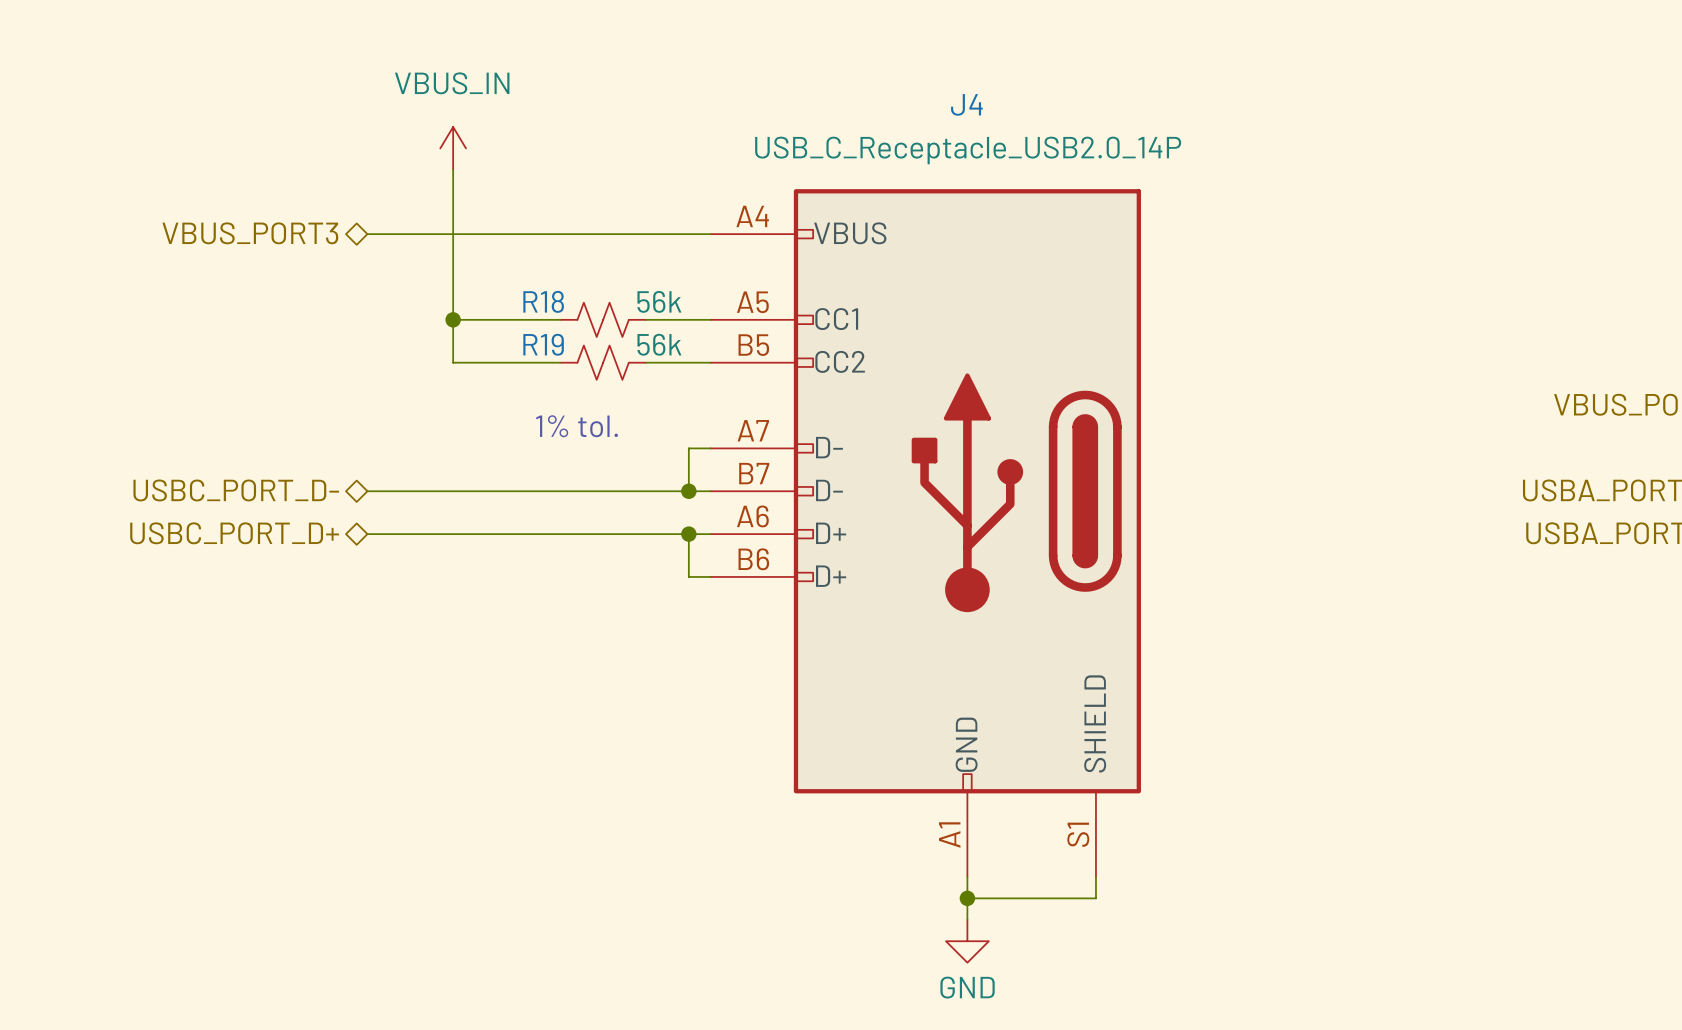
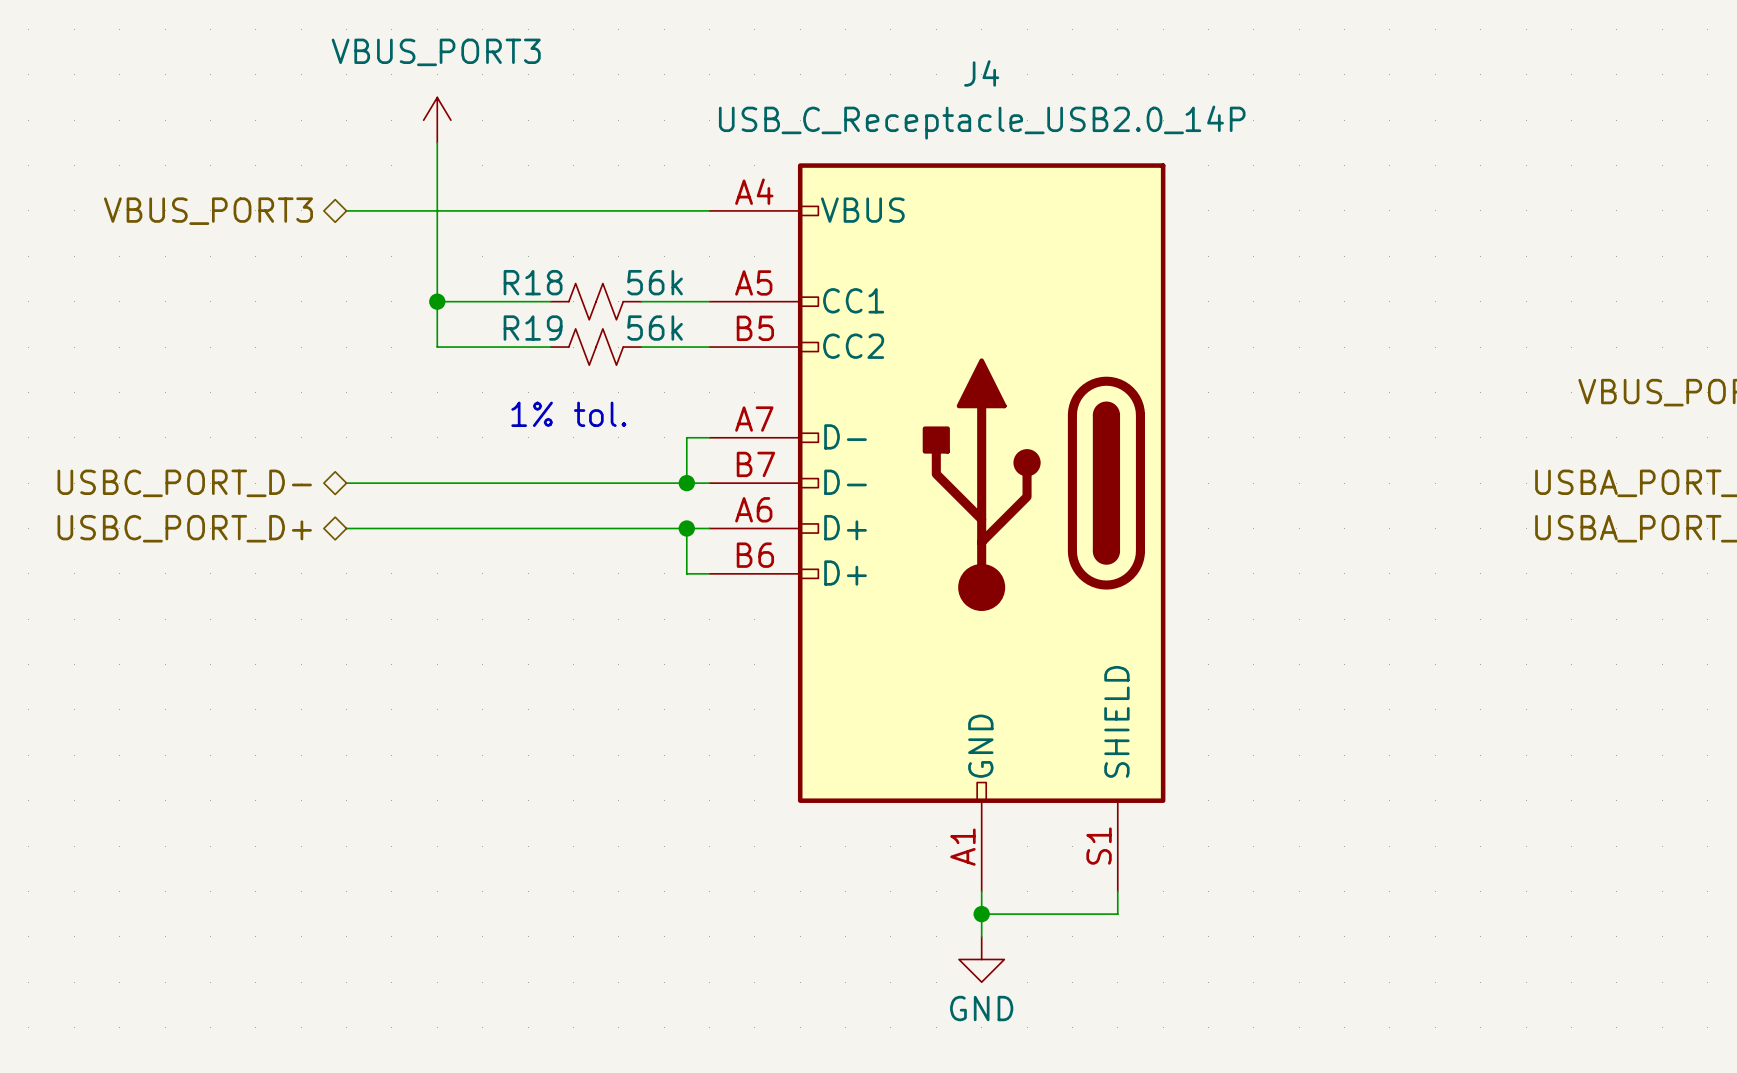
power symbol: VBUS_IN (453, 148) -> VBUS_PORT3 (437, 120)

